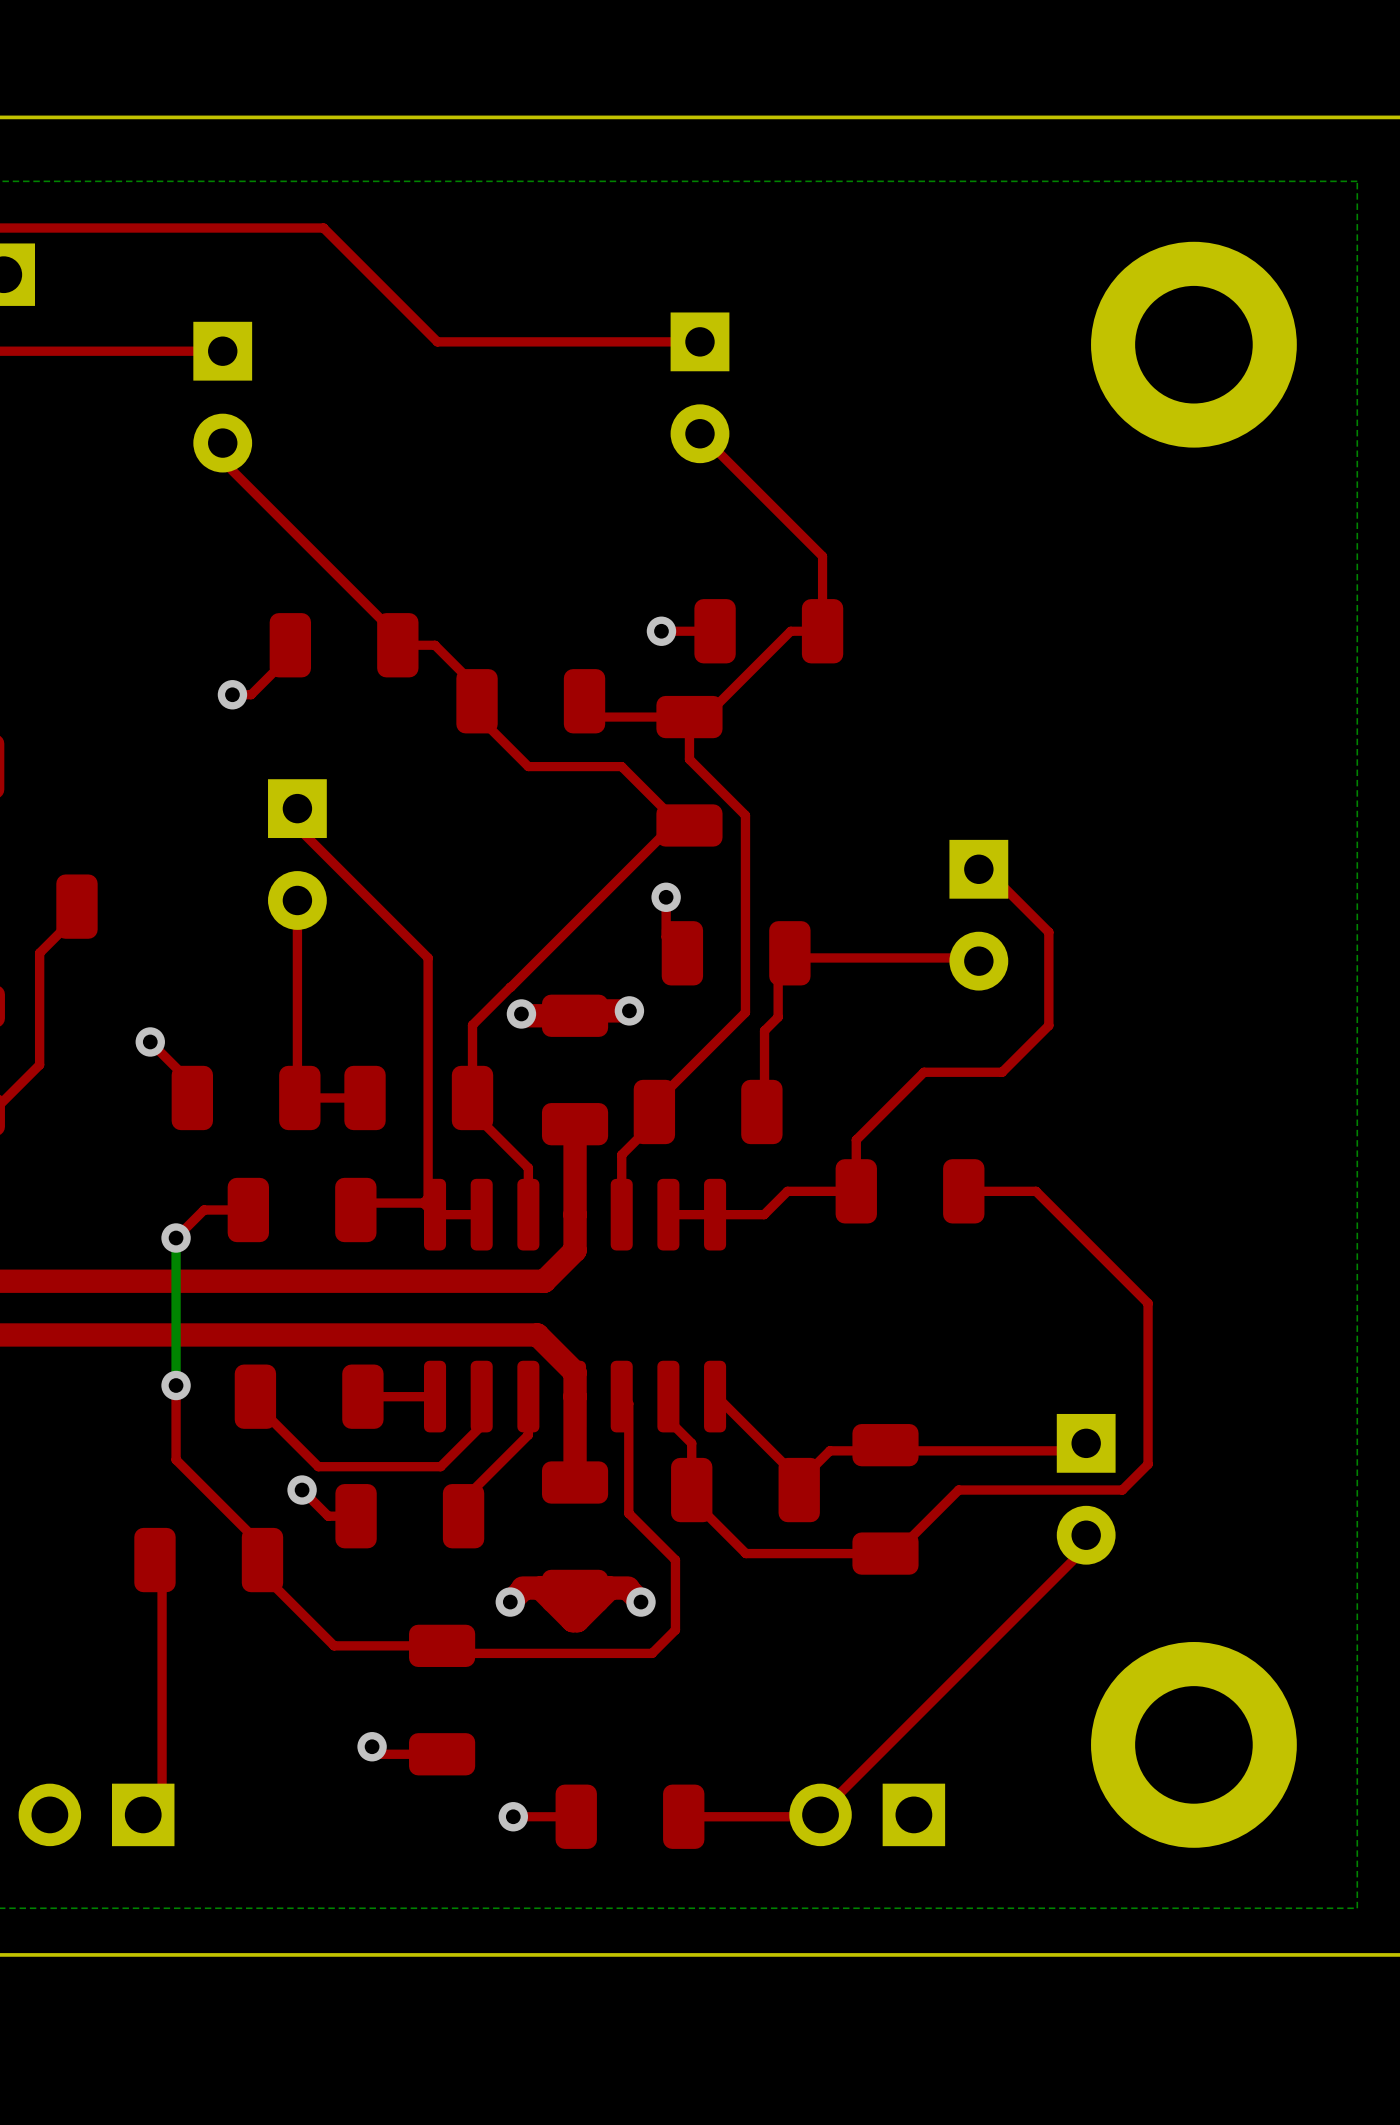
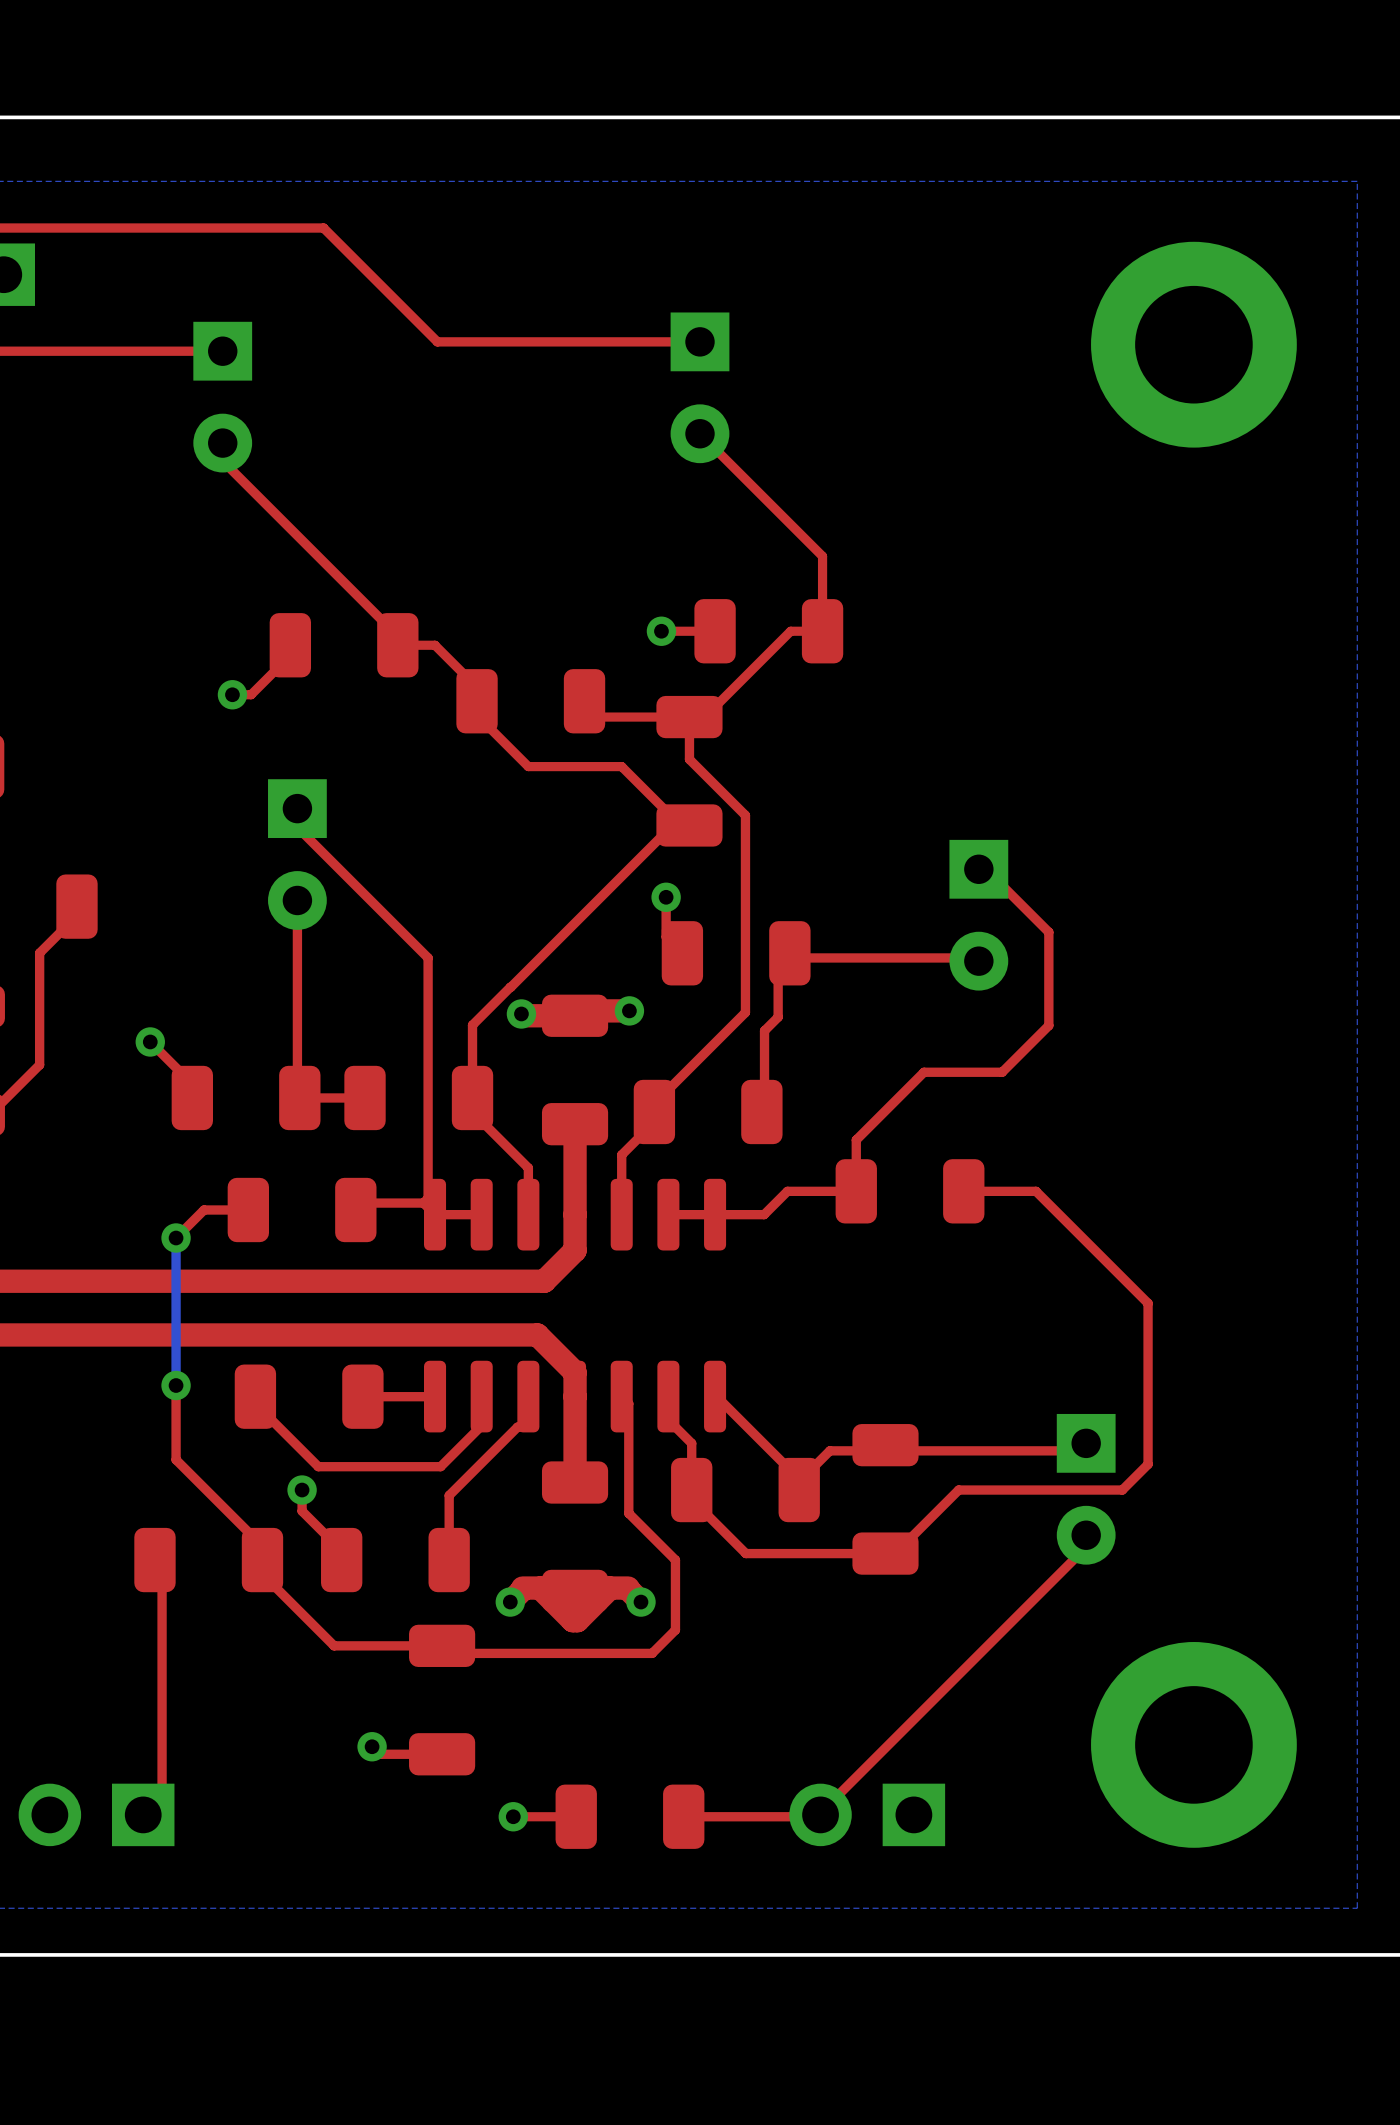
top track: (528, 1427) (528, 1434) (467, 1495) -> (528, 1427) (517, 1427) (449, 1495) (449, 1560)
top track: (302, 1490) (328, 1516) (356, 1516) -> (302, 1490) (302, 1511) (341, 1550)
part position: (409, 1516) -> (395, 1560)

